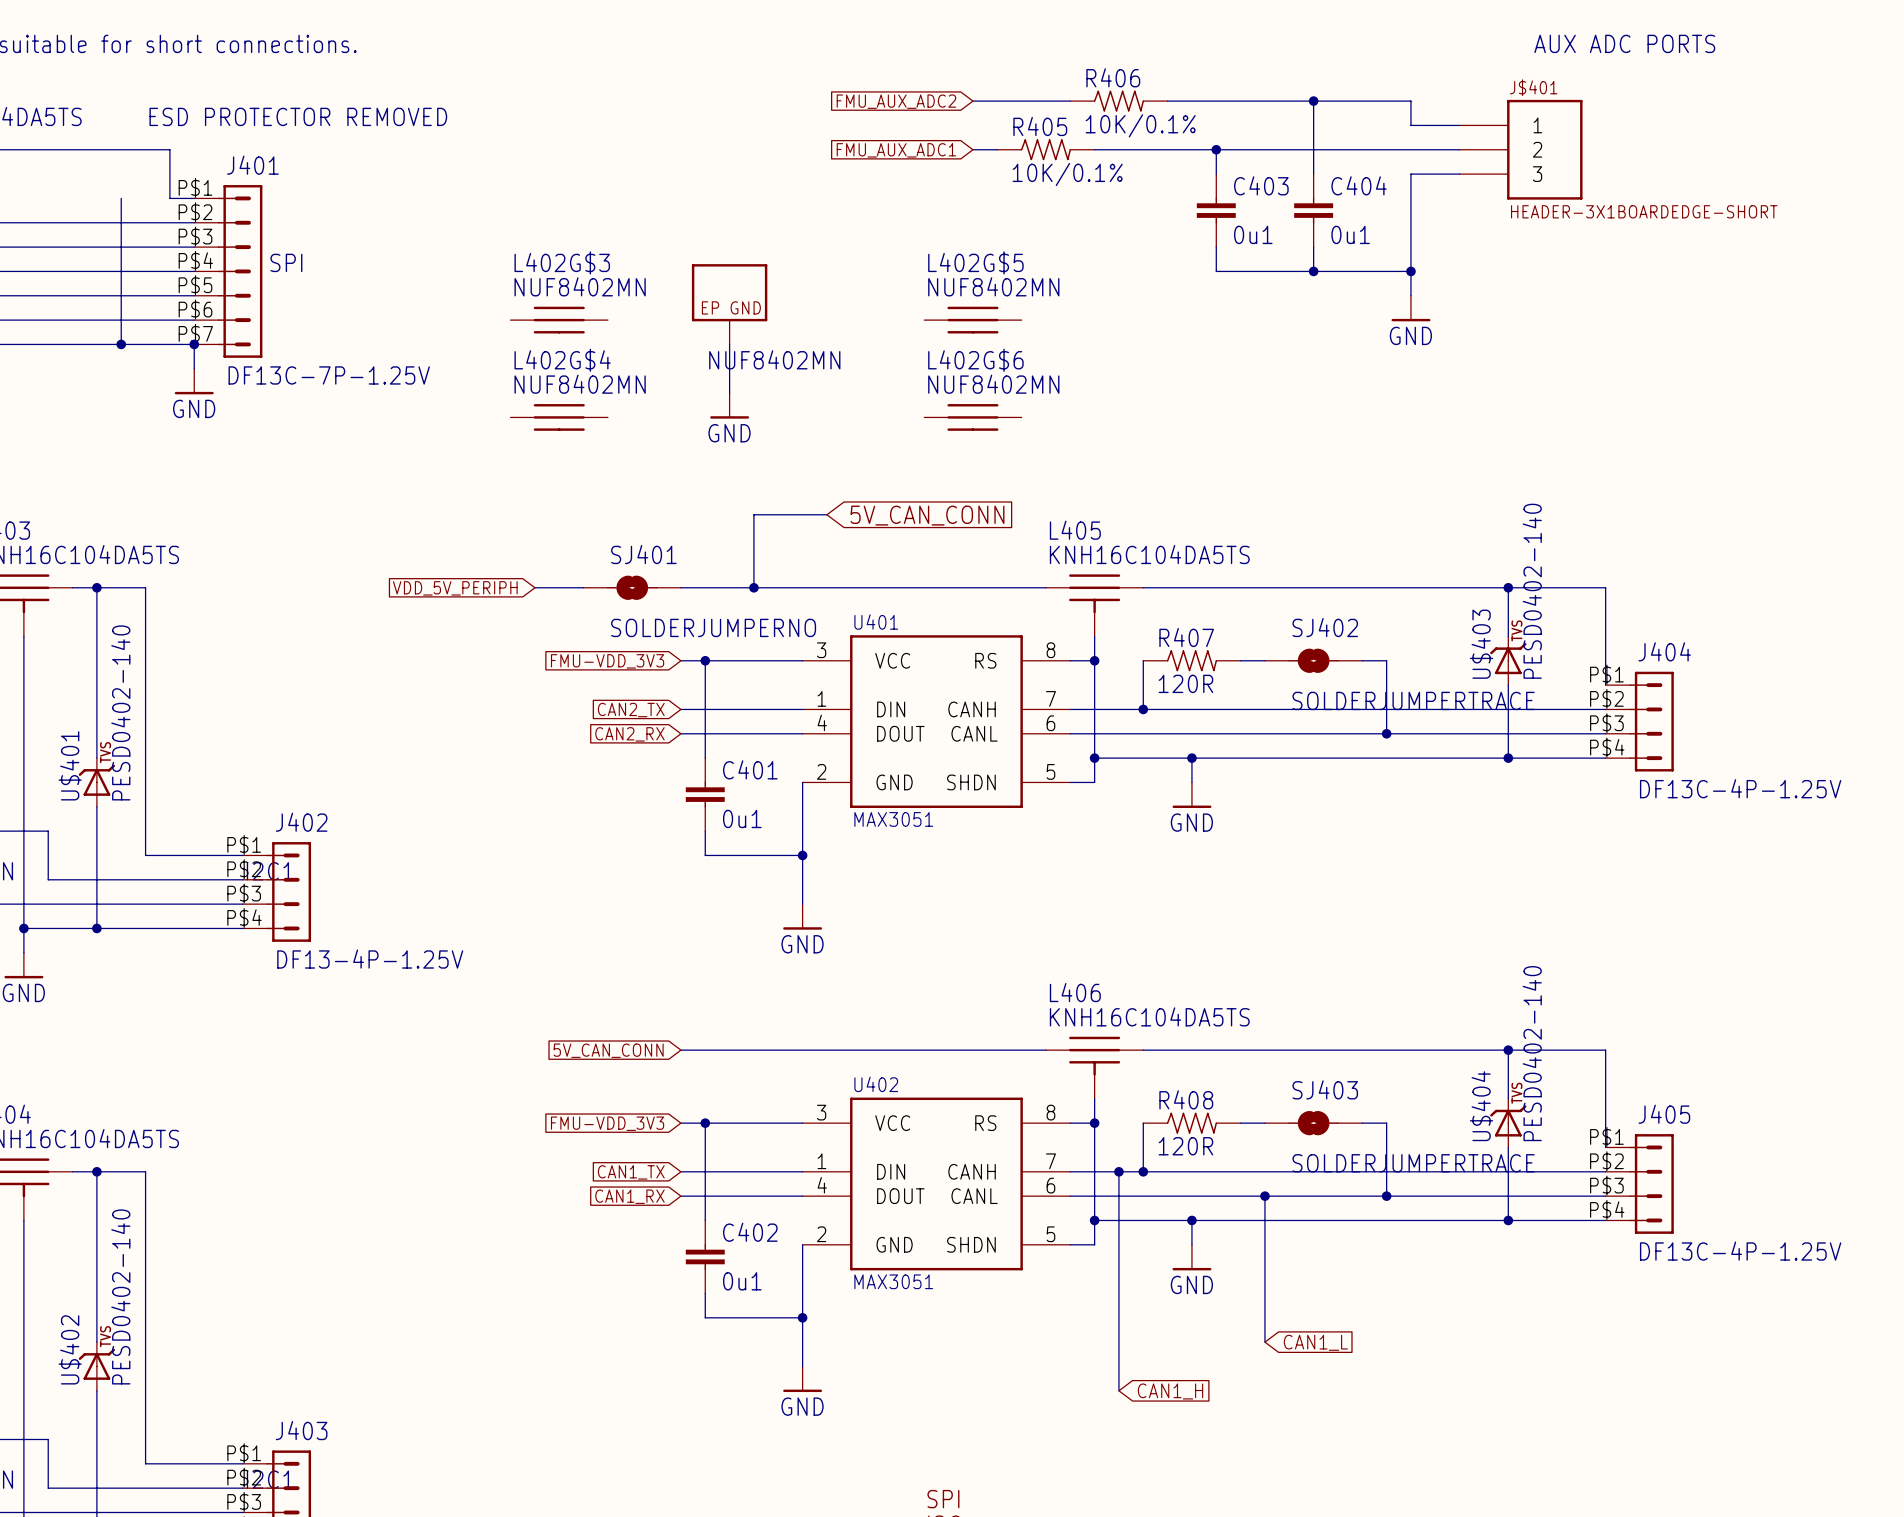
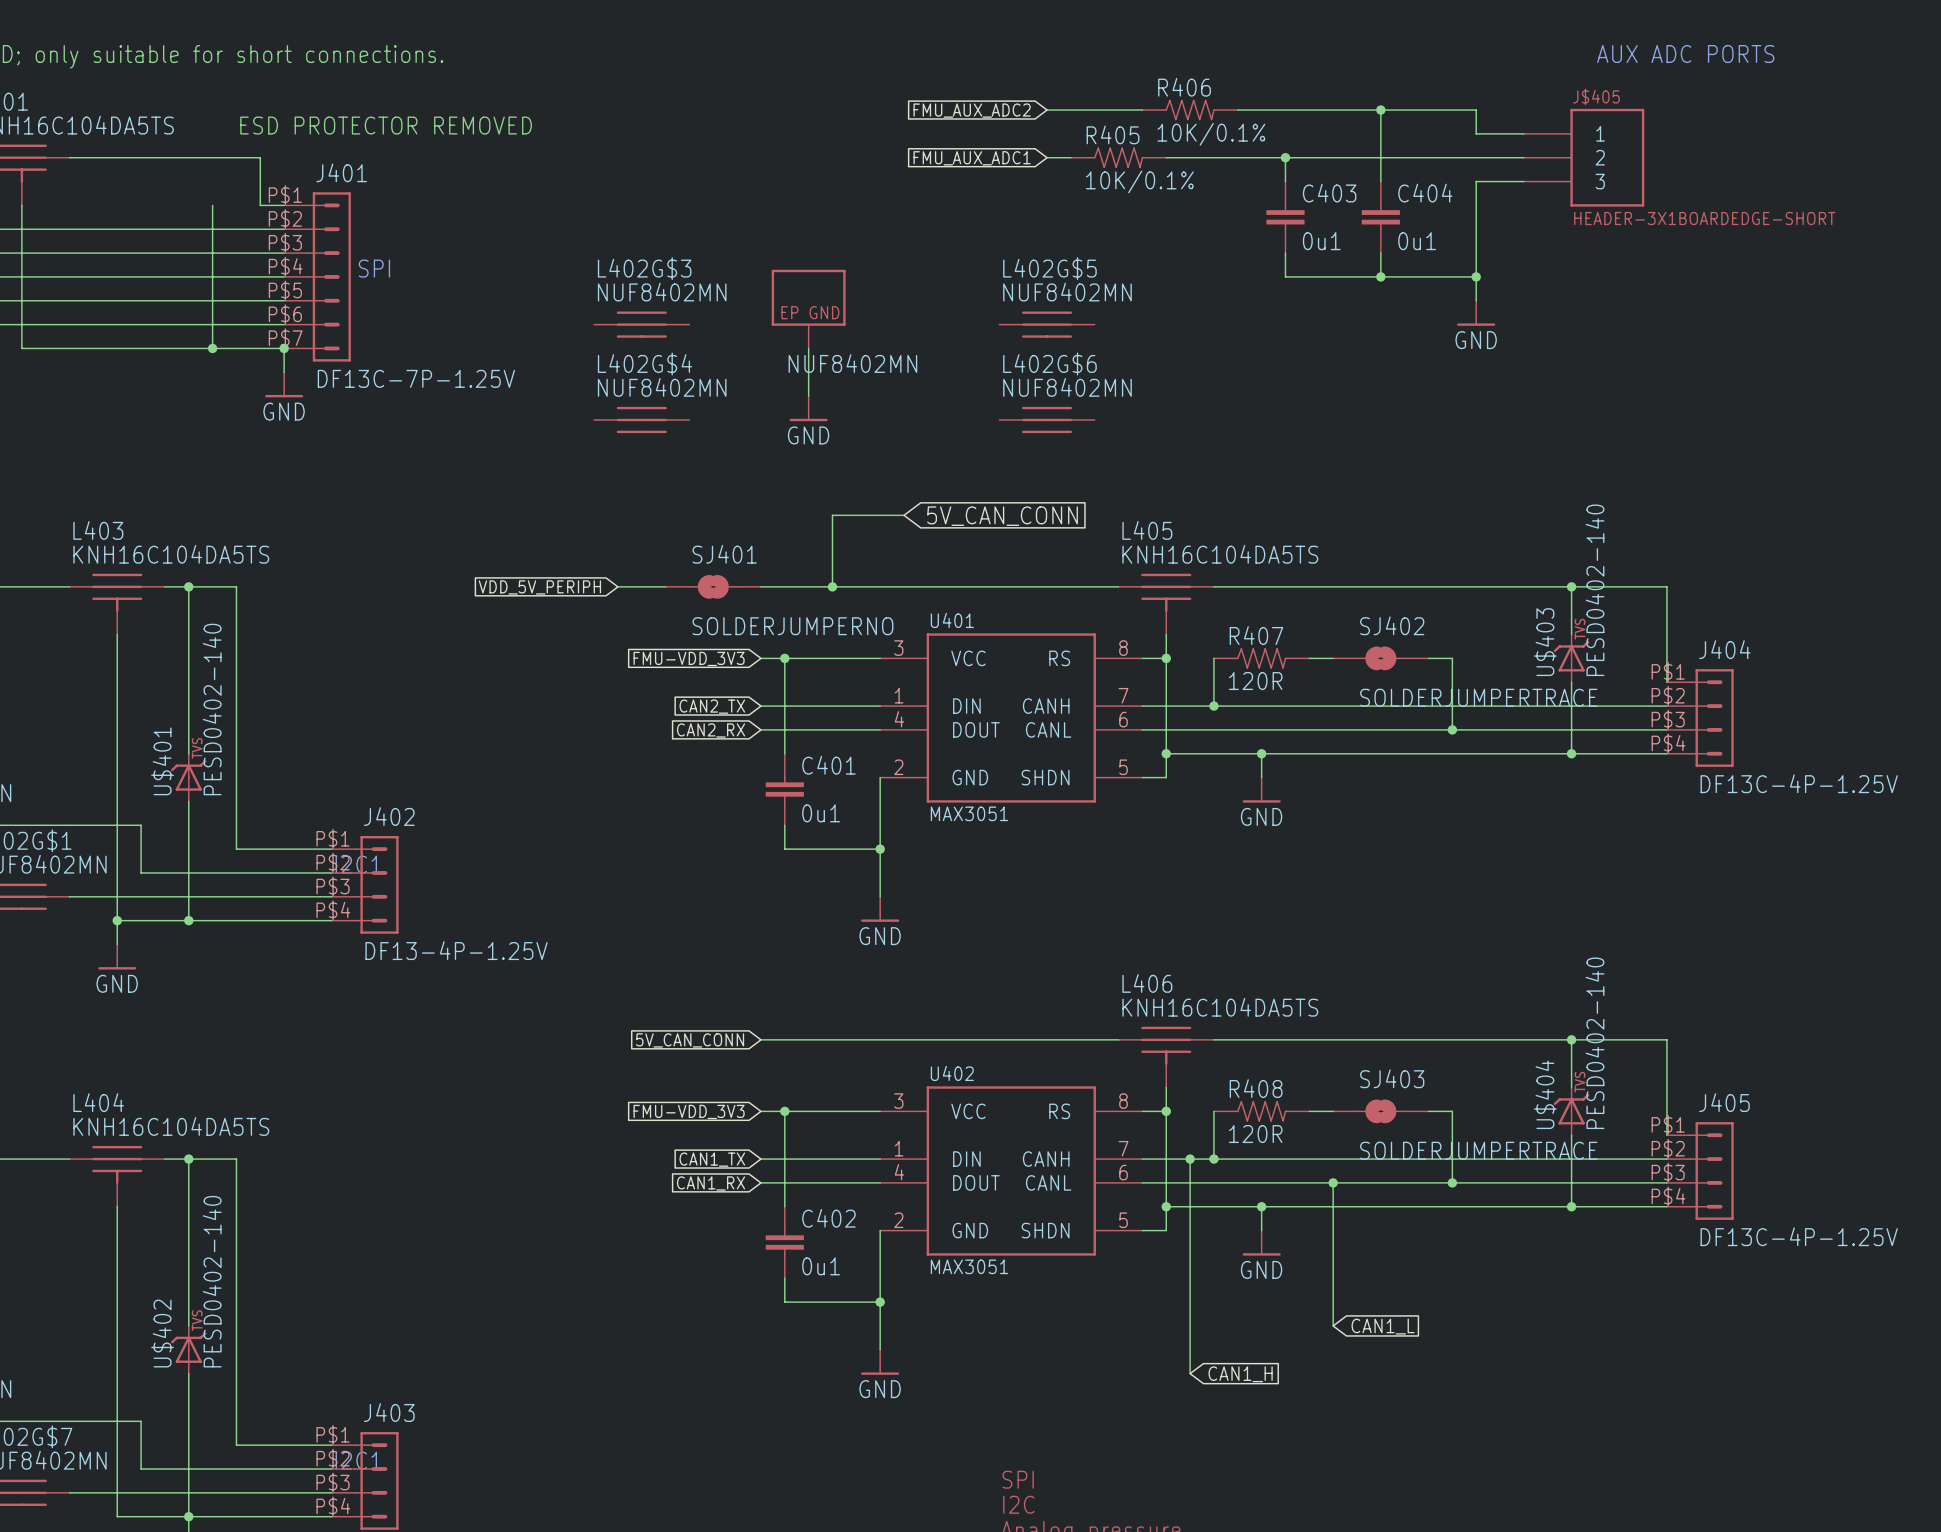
J$401 name: J$401 (1533, 87) -> J$405 (1596, 96)

